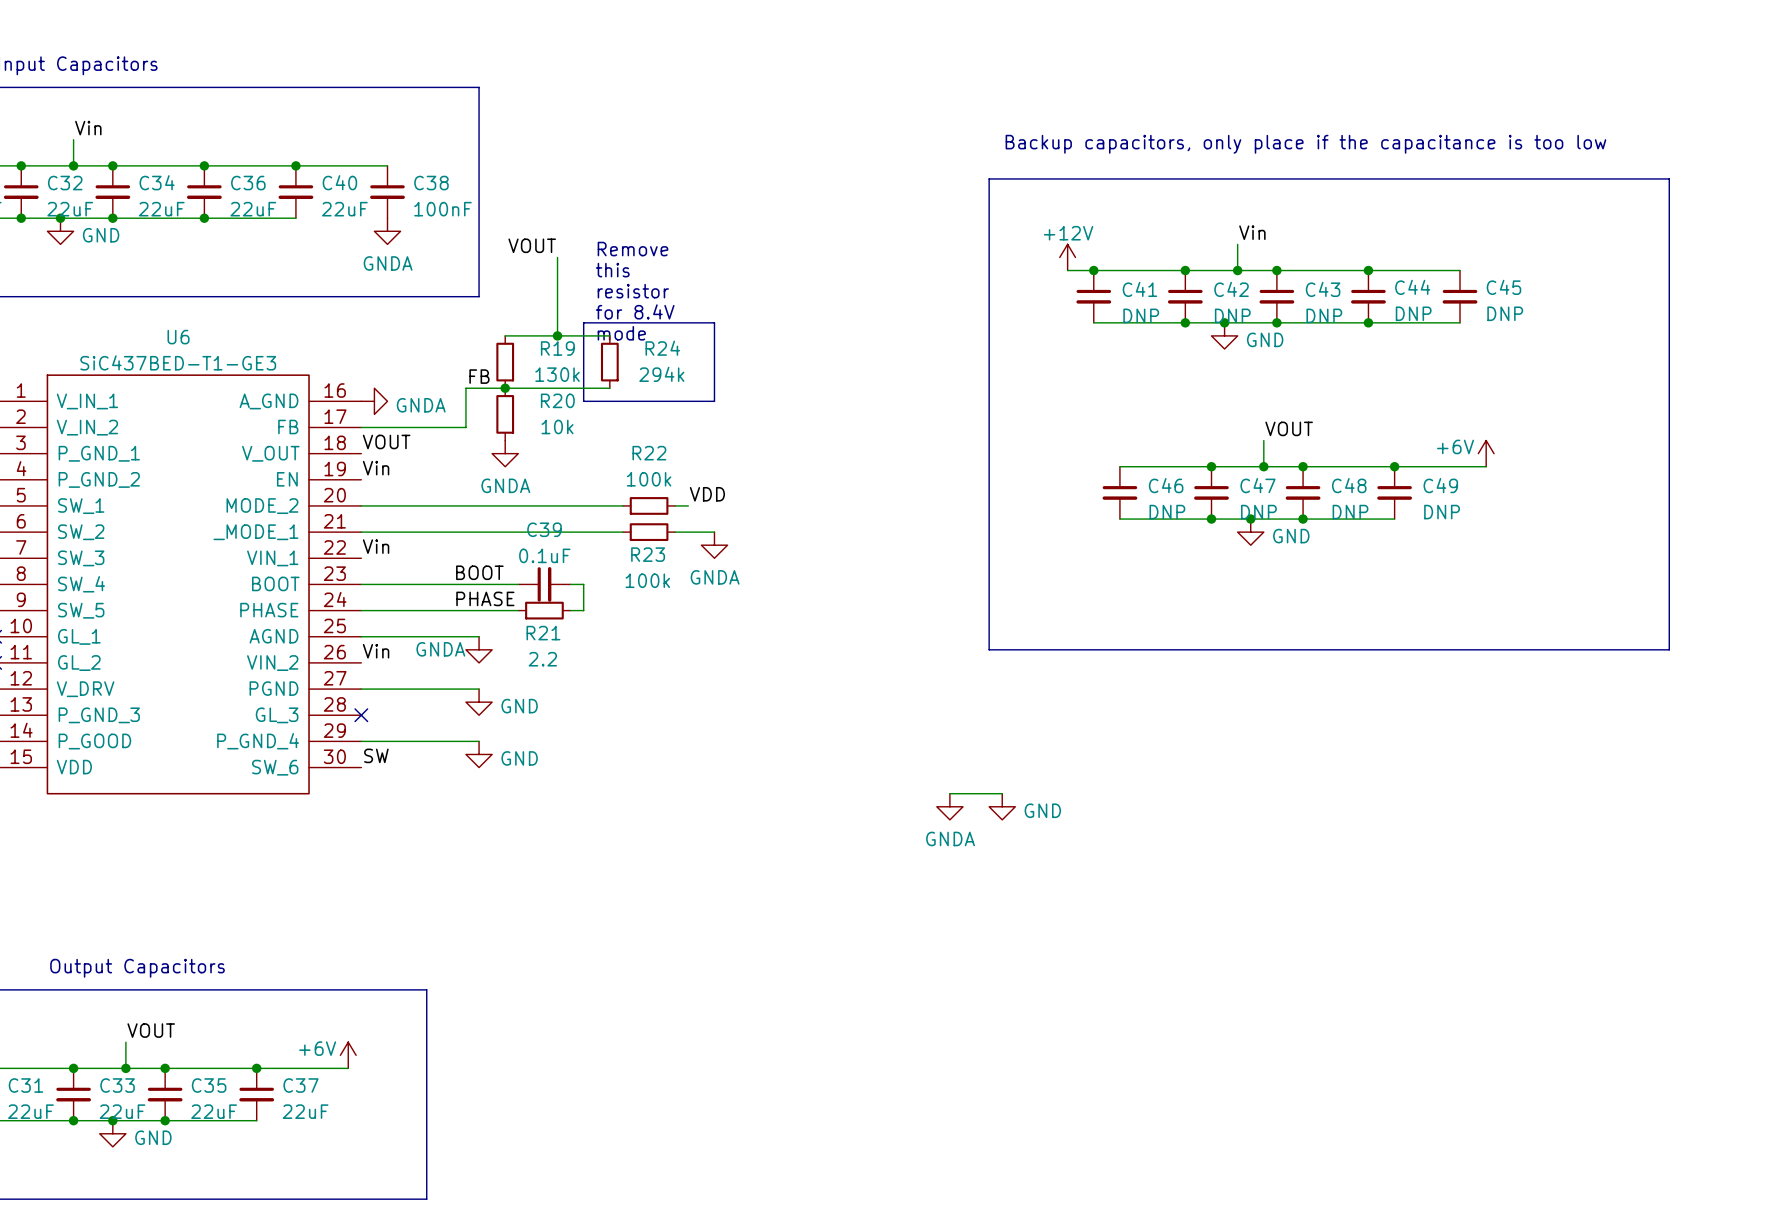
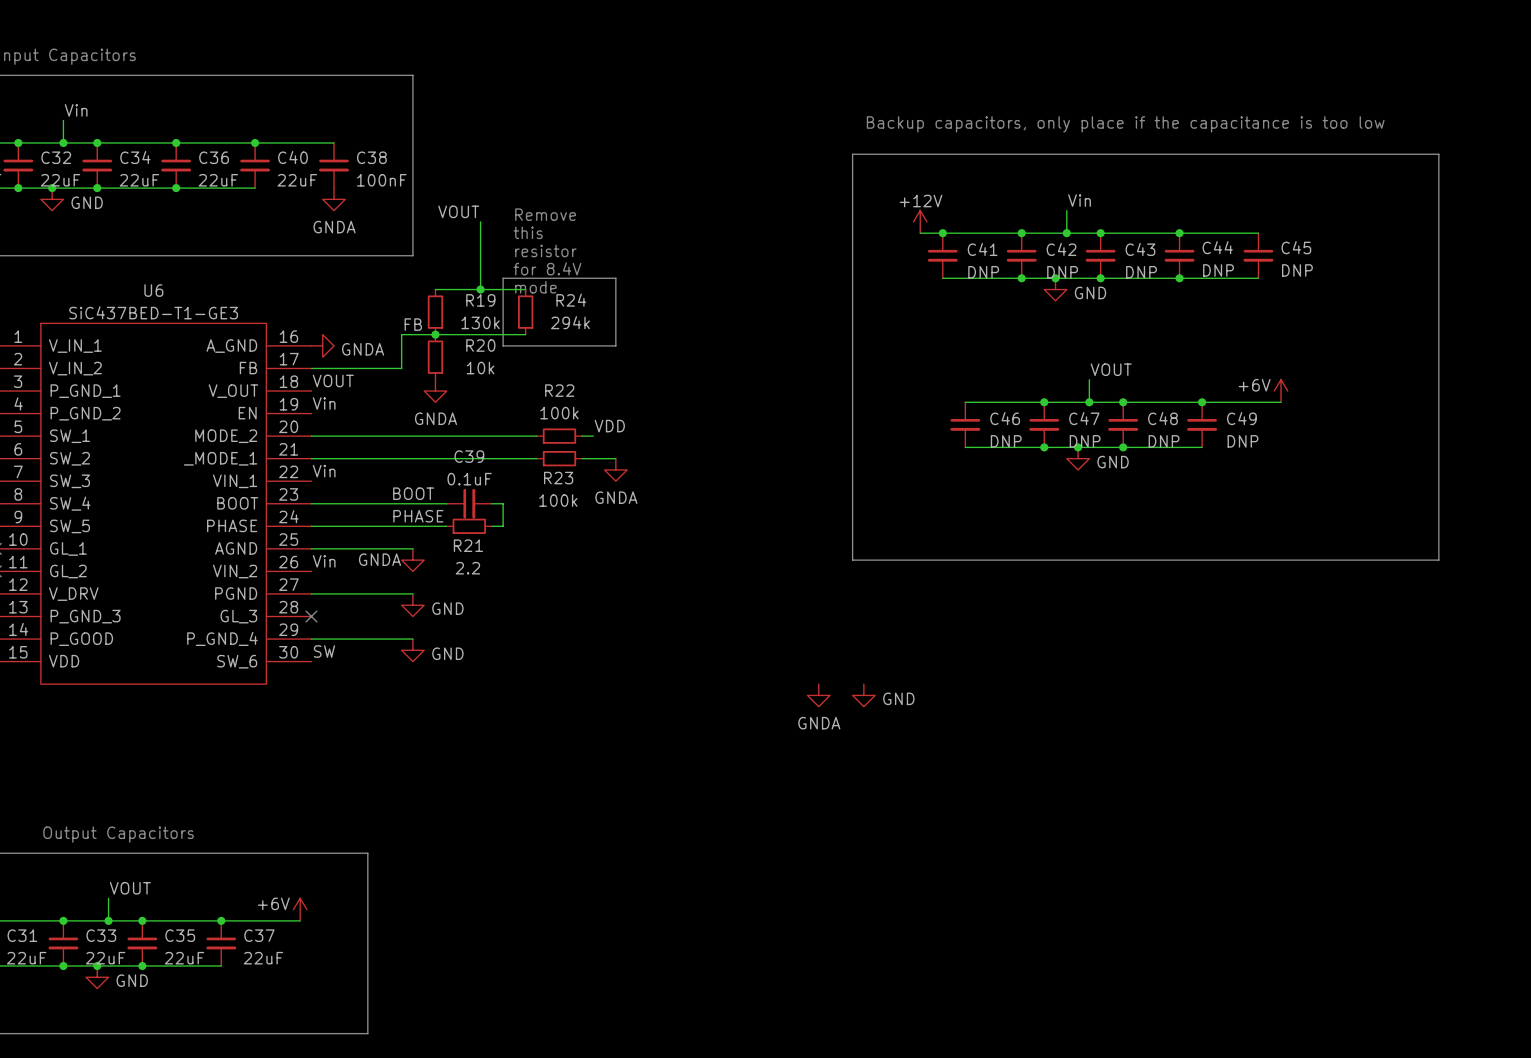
wire: (949, 793) (1002, 793) -> none

